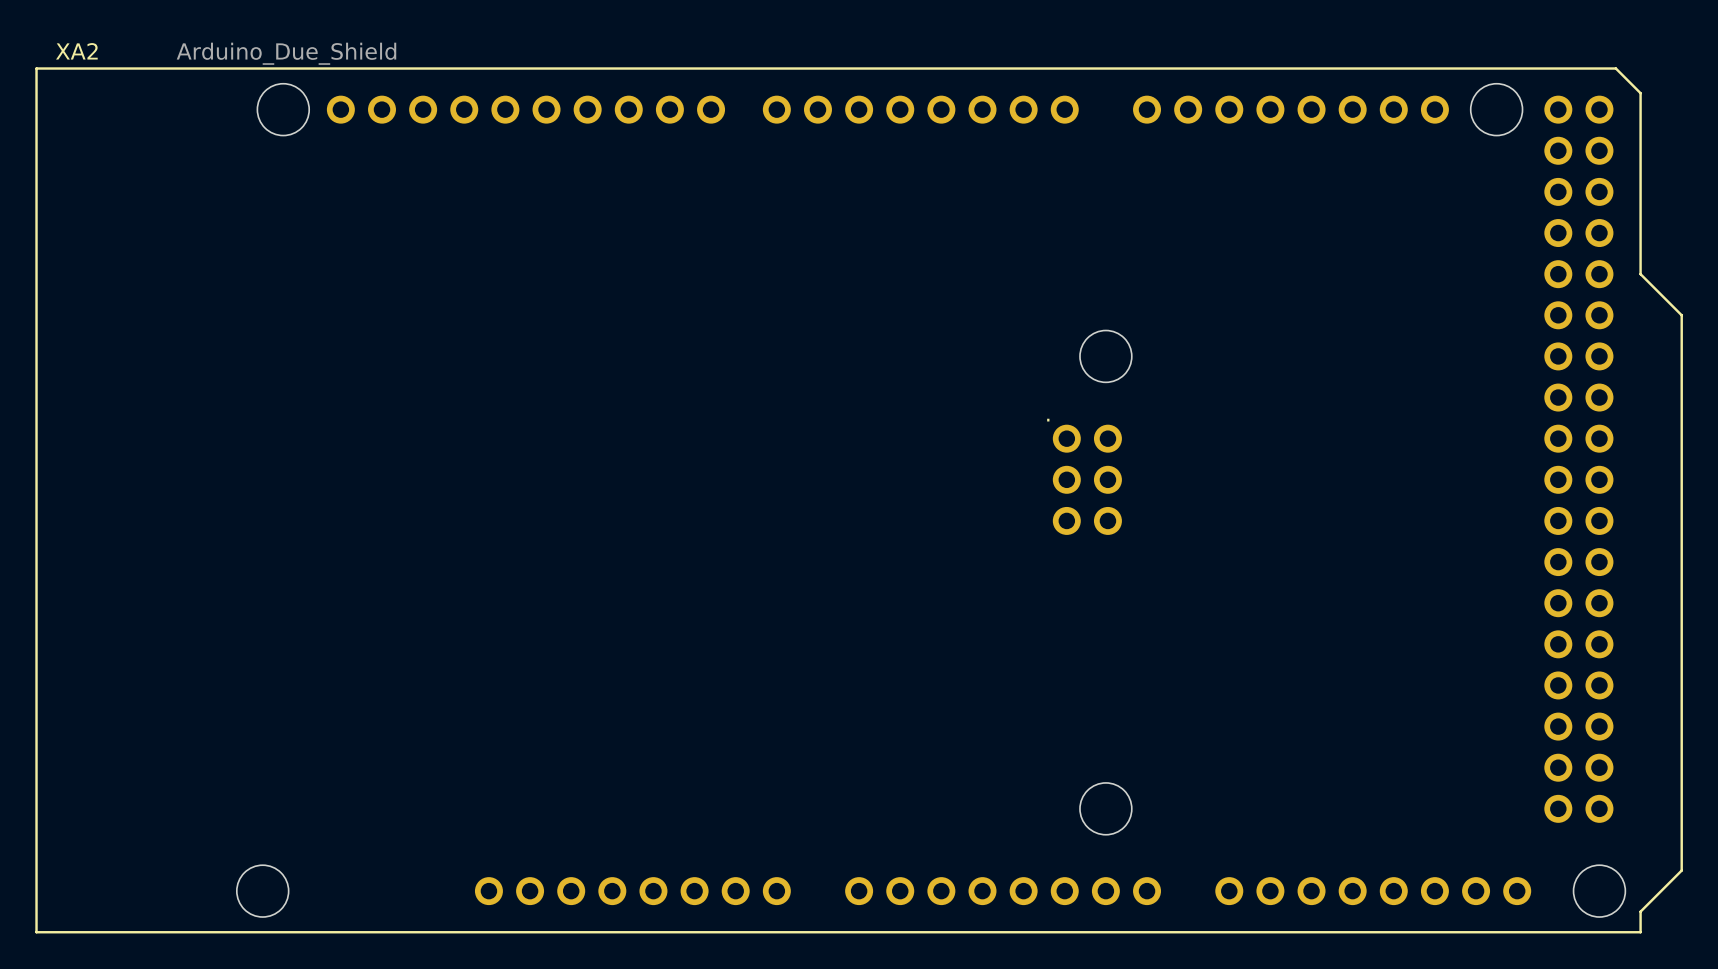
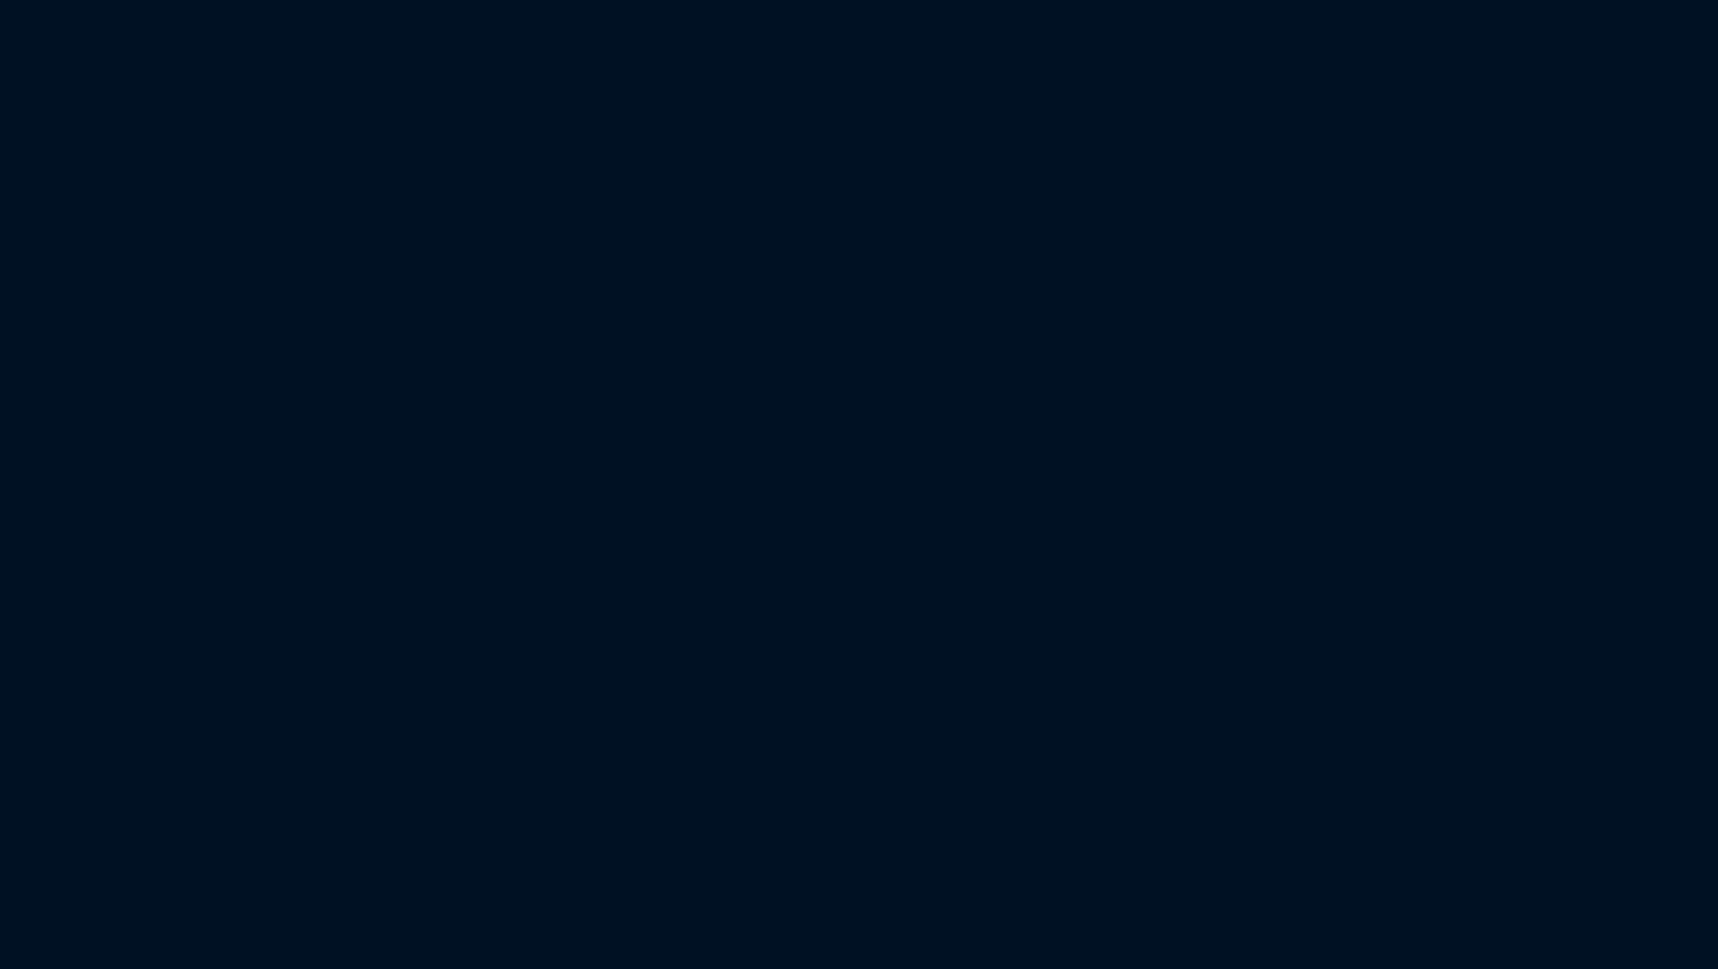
XA2: Arduino_Due_Shield (859, 500) -> none

